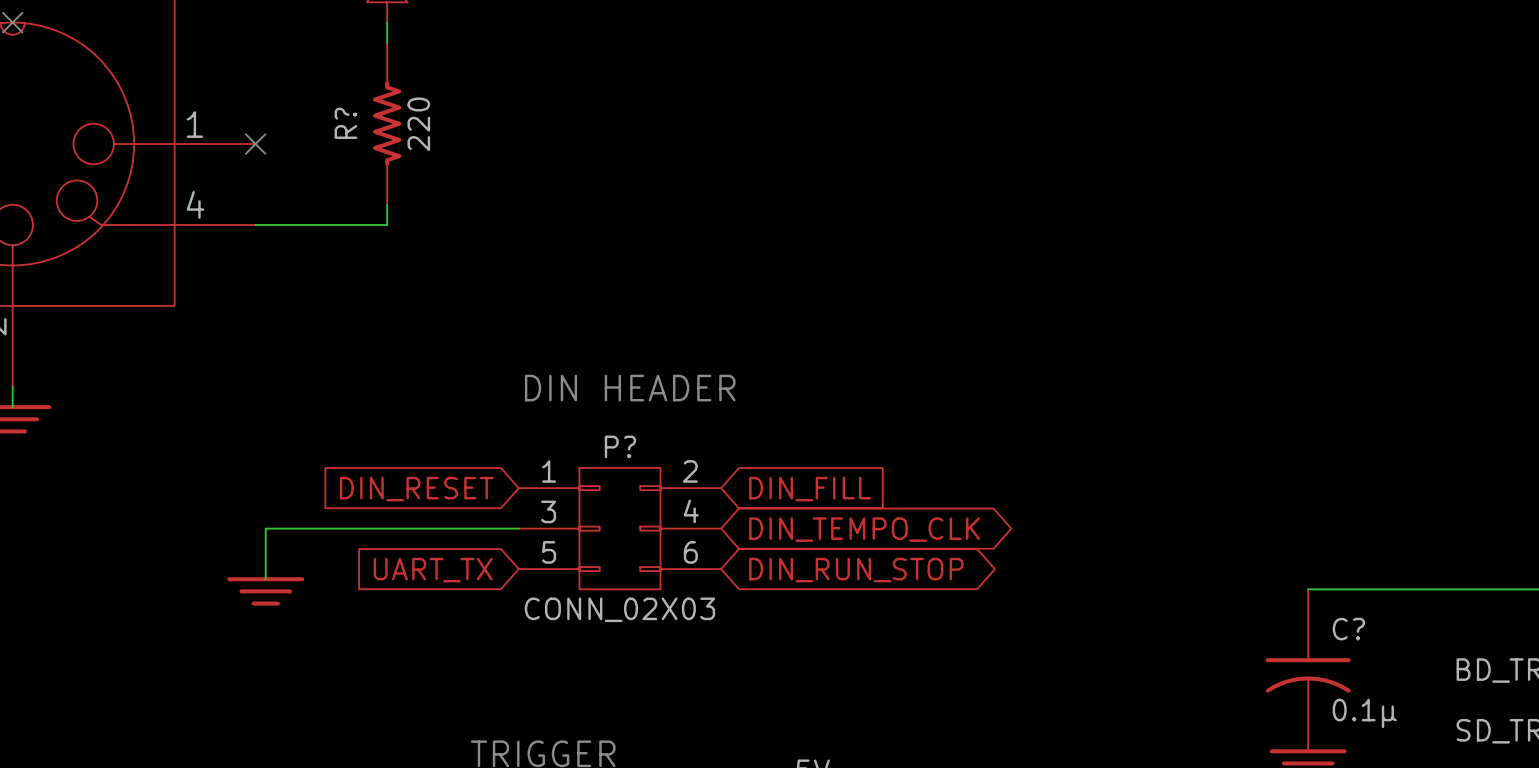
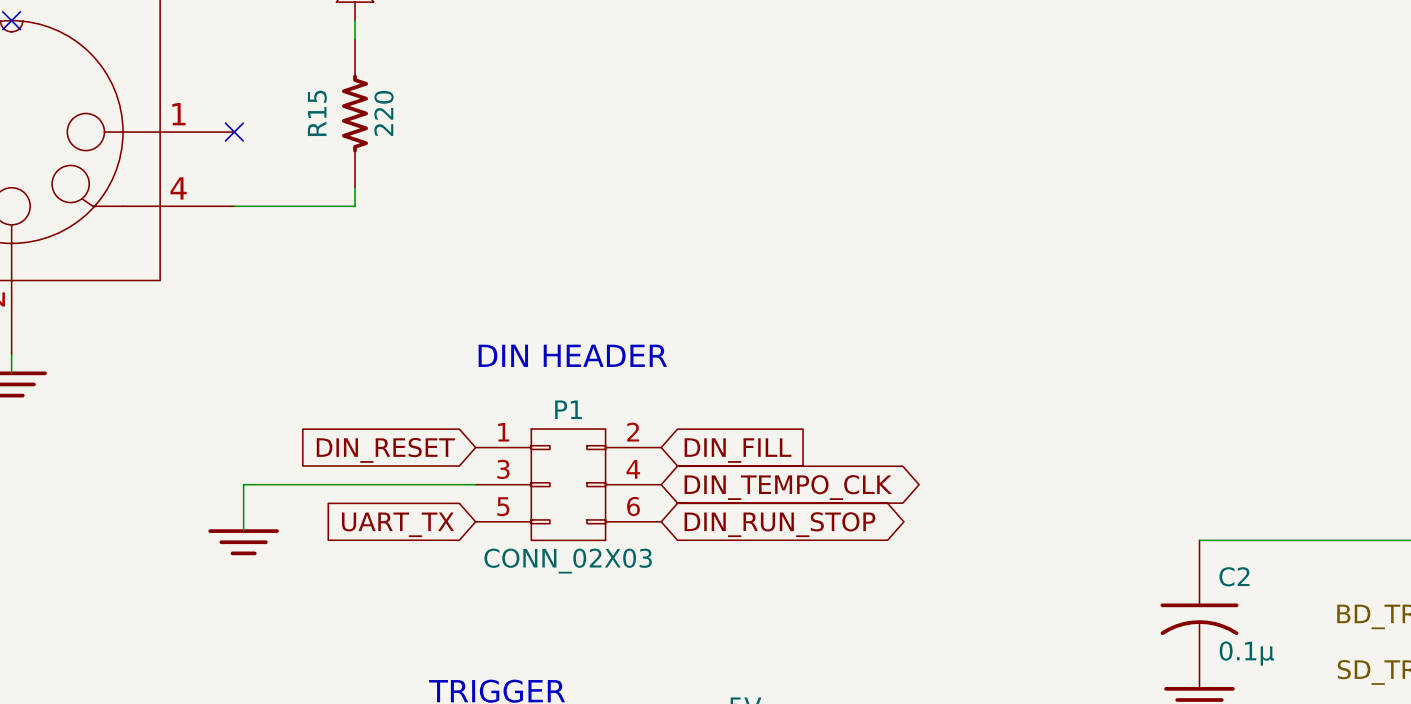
R? name: R? (345, 123) -> R15 (317, 113)
P? name: P? (620, 446) -> P1 (568, 409)
C? name: C? (1348, 629) -> C2 (1234, 576)

